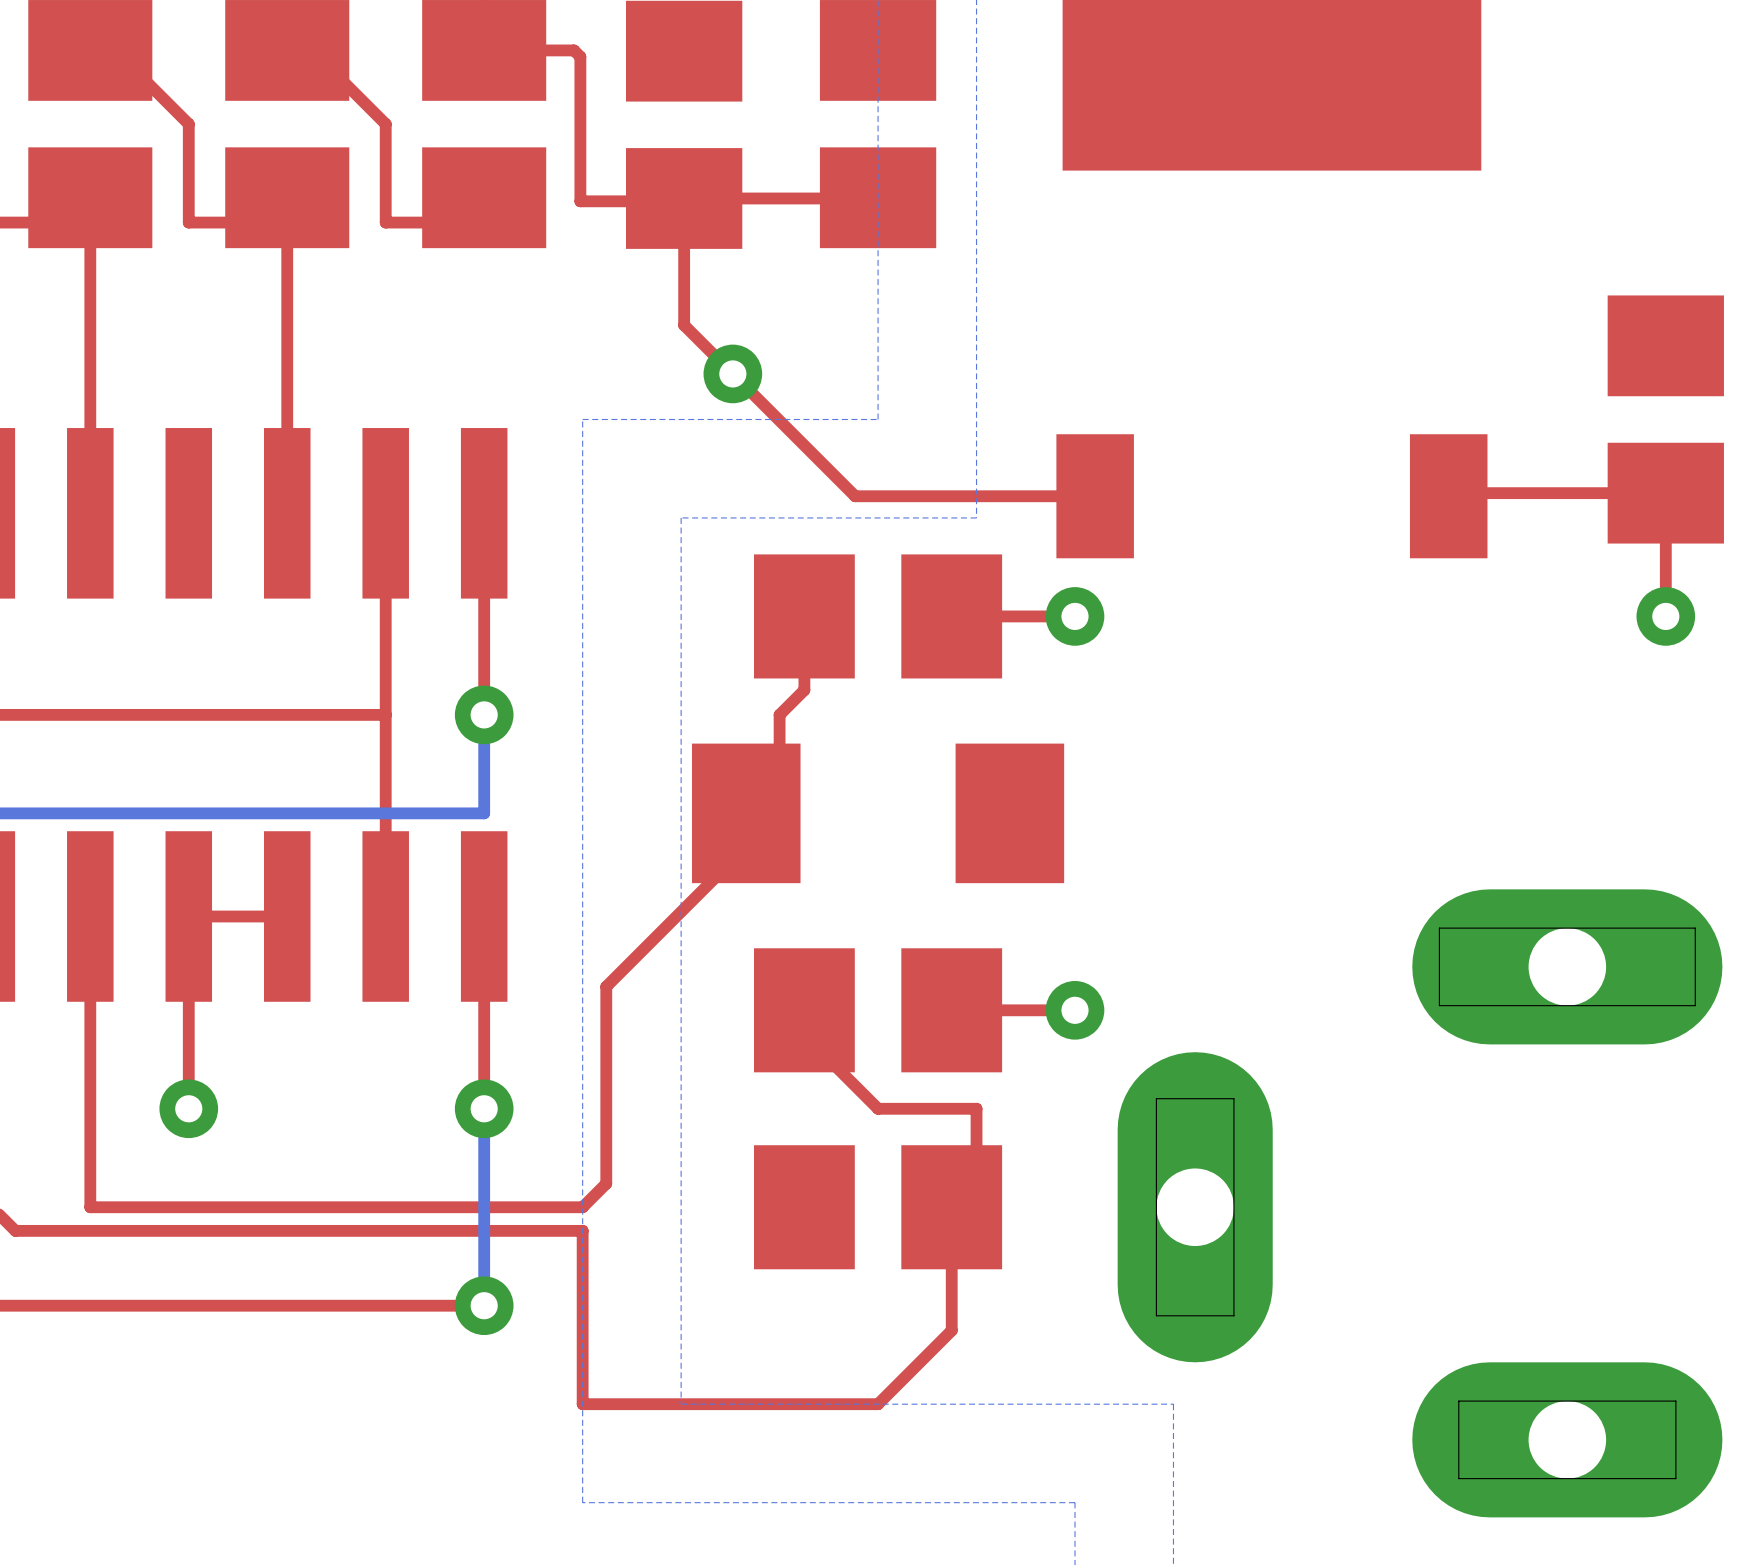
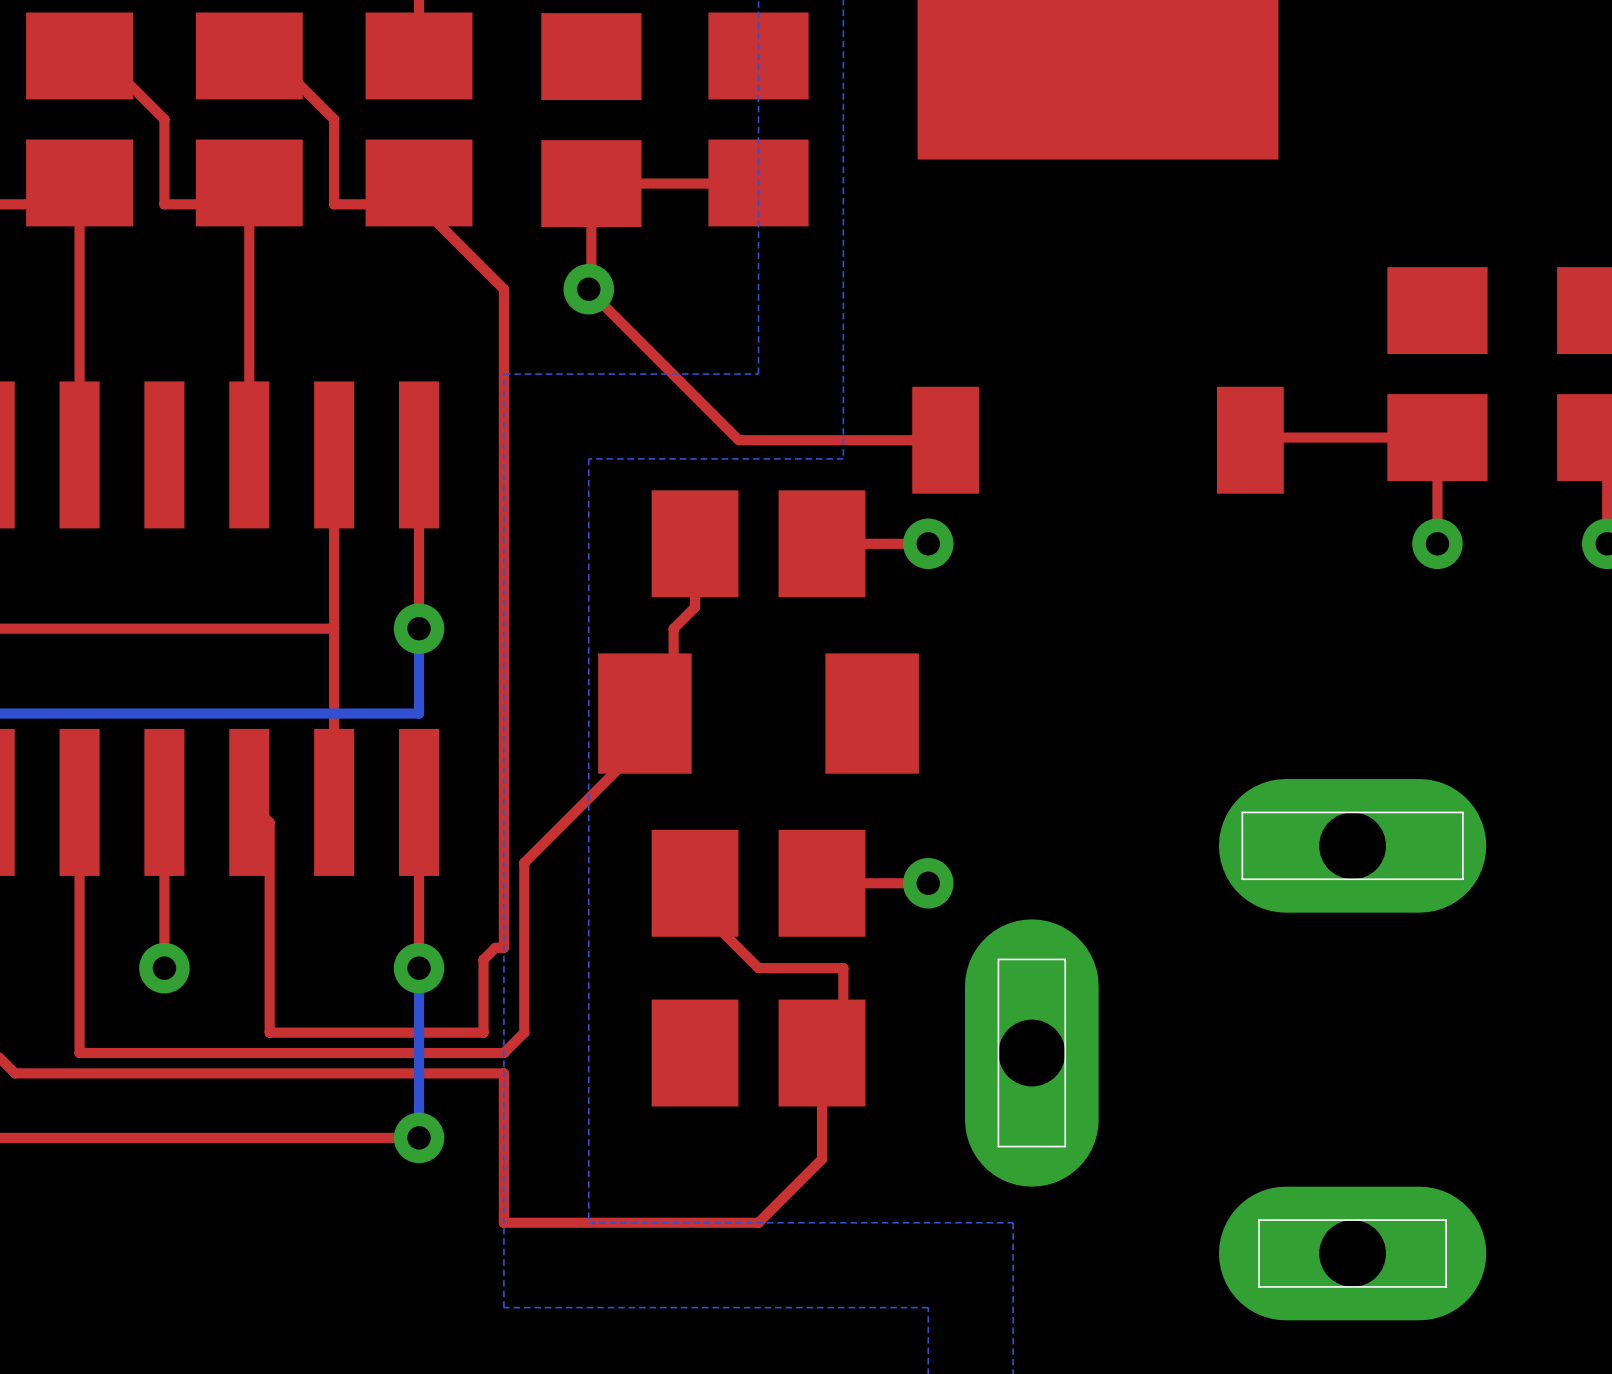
top track: (484, 50) (574, 50) (580, 56) (580, 201) (681, 201) (684, 198) -> none
via position: (732, 373) -> (588, 289)
top track: (287, 916) (188, 916) -> (249, 802) (269, 822) (269, 1032) (483, 1032) (483, 959) (495, 947) (503, 947) (503, 289) (419, 204)

